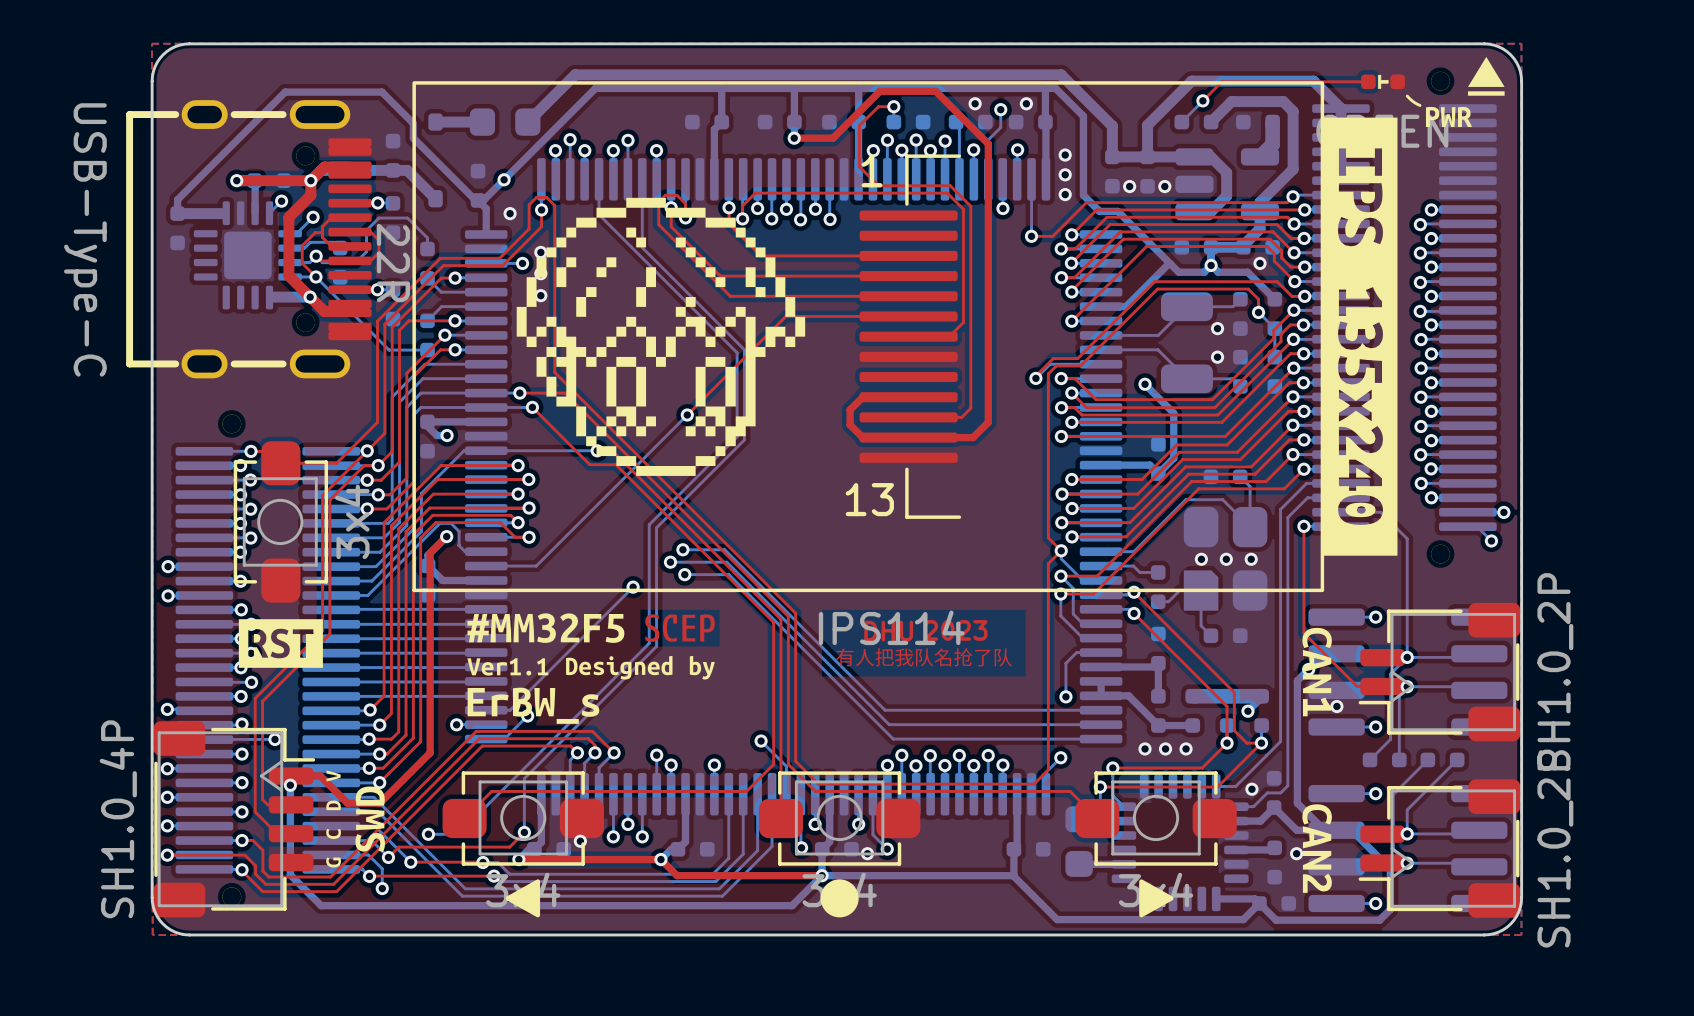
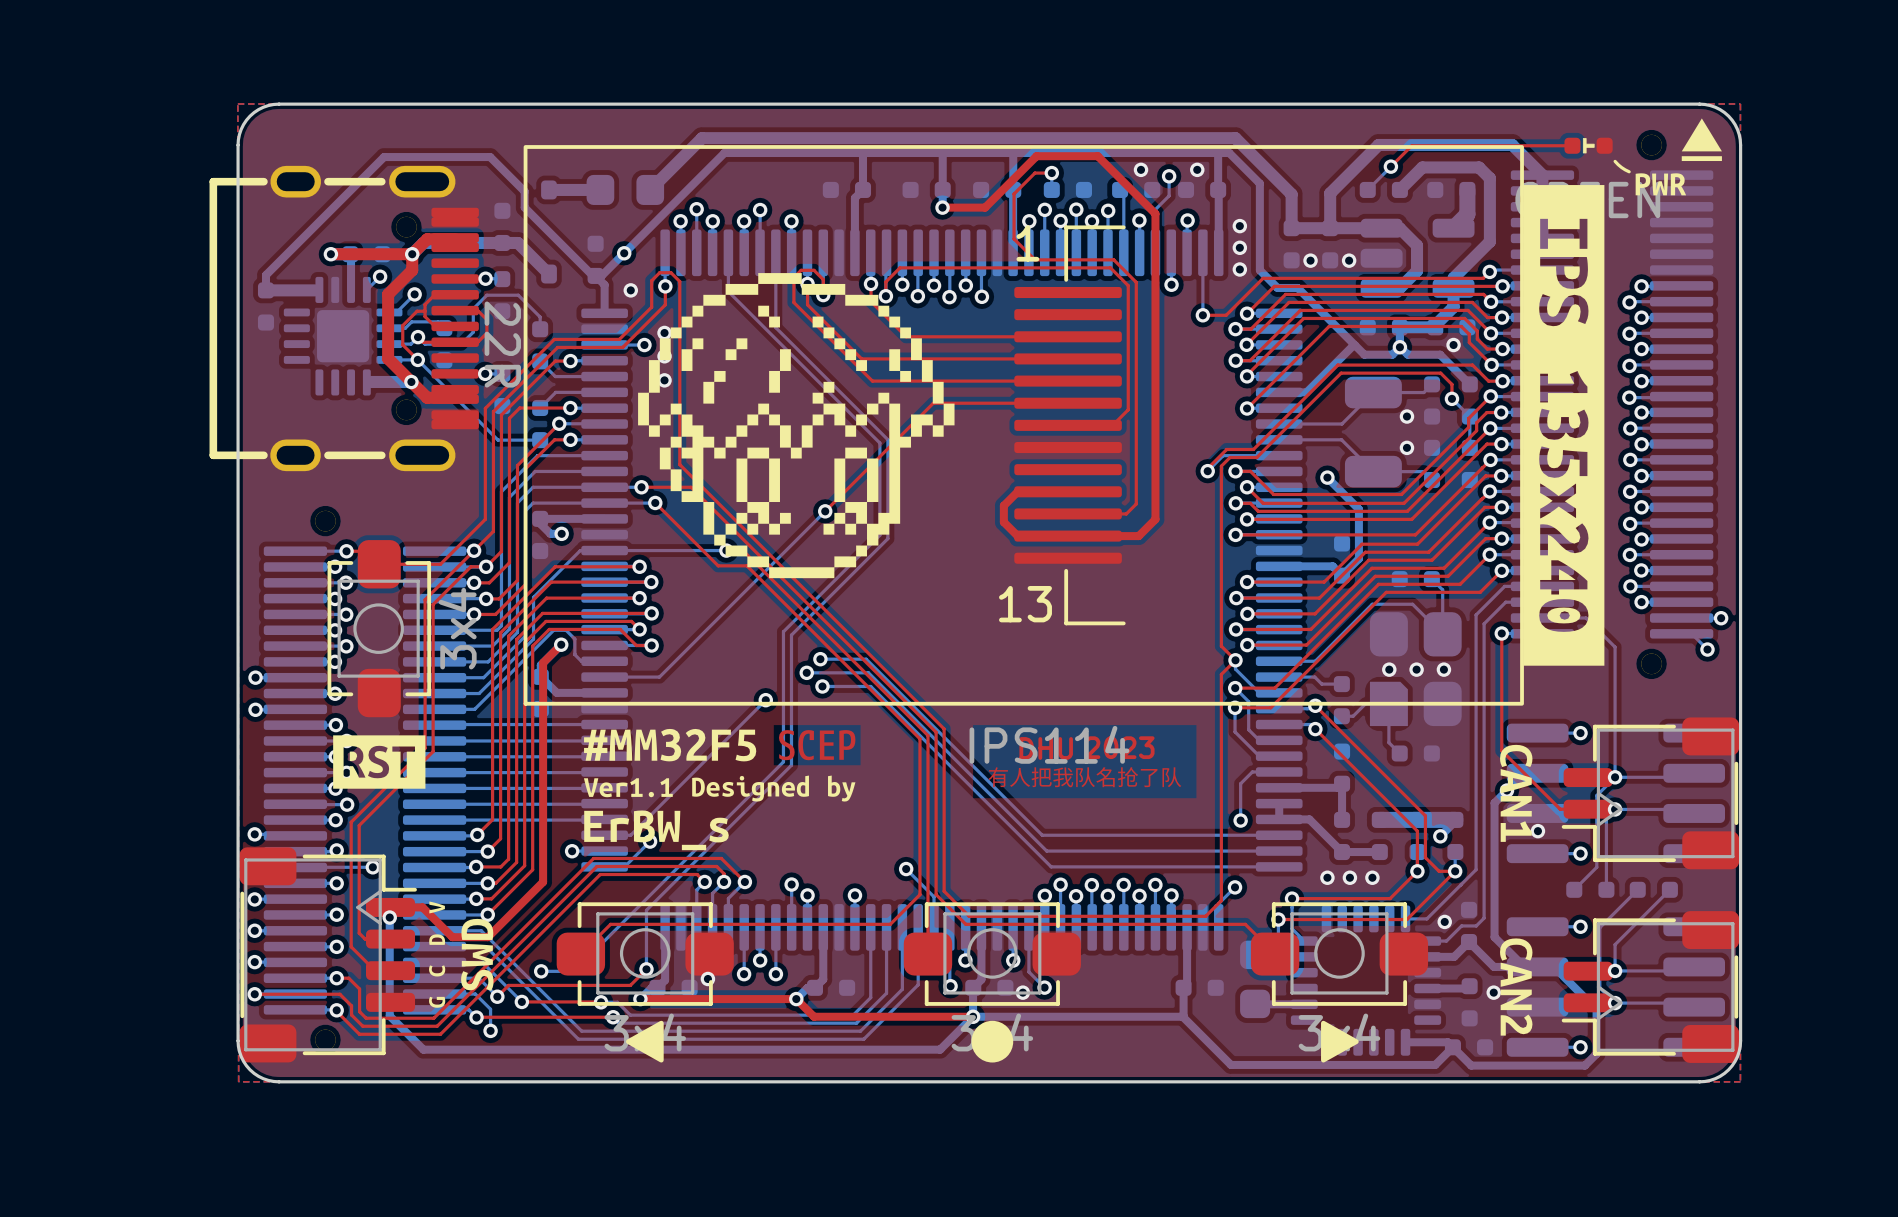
part value: USB-Type-C (85, 239) -> none
part value: SH1.0_2P (1555, 672) -> none
part value: SH1.0_4P (118, 819) -> none
part value: SH1.0_2P (1555, 848) -> none

